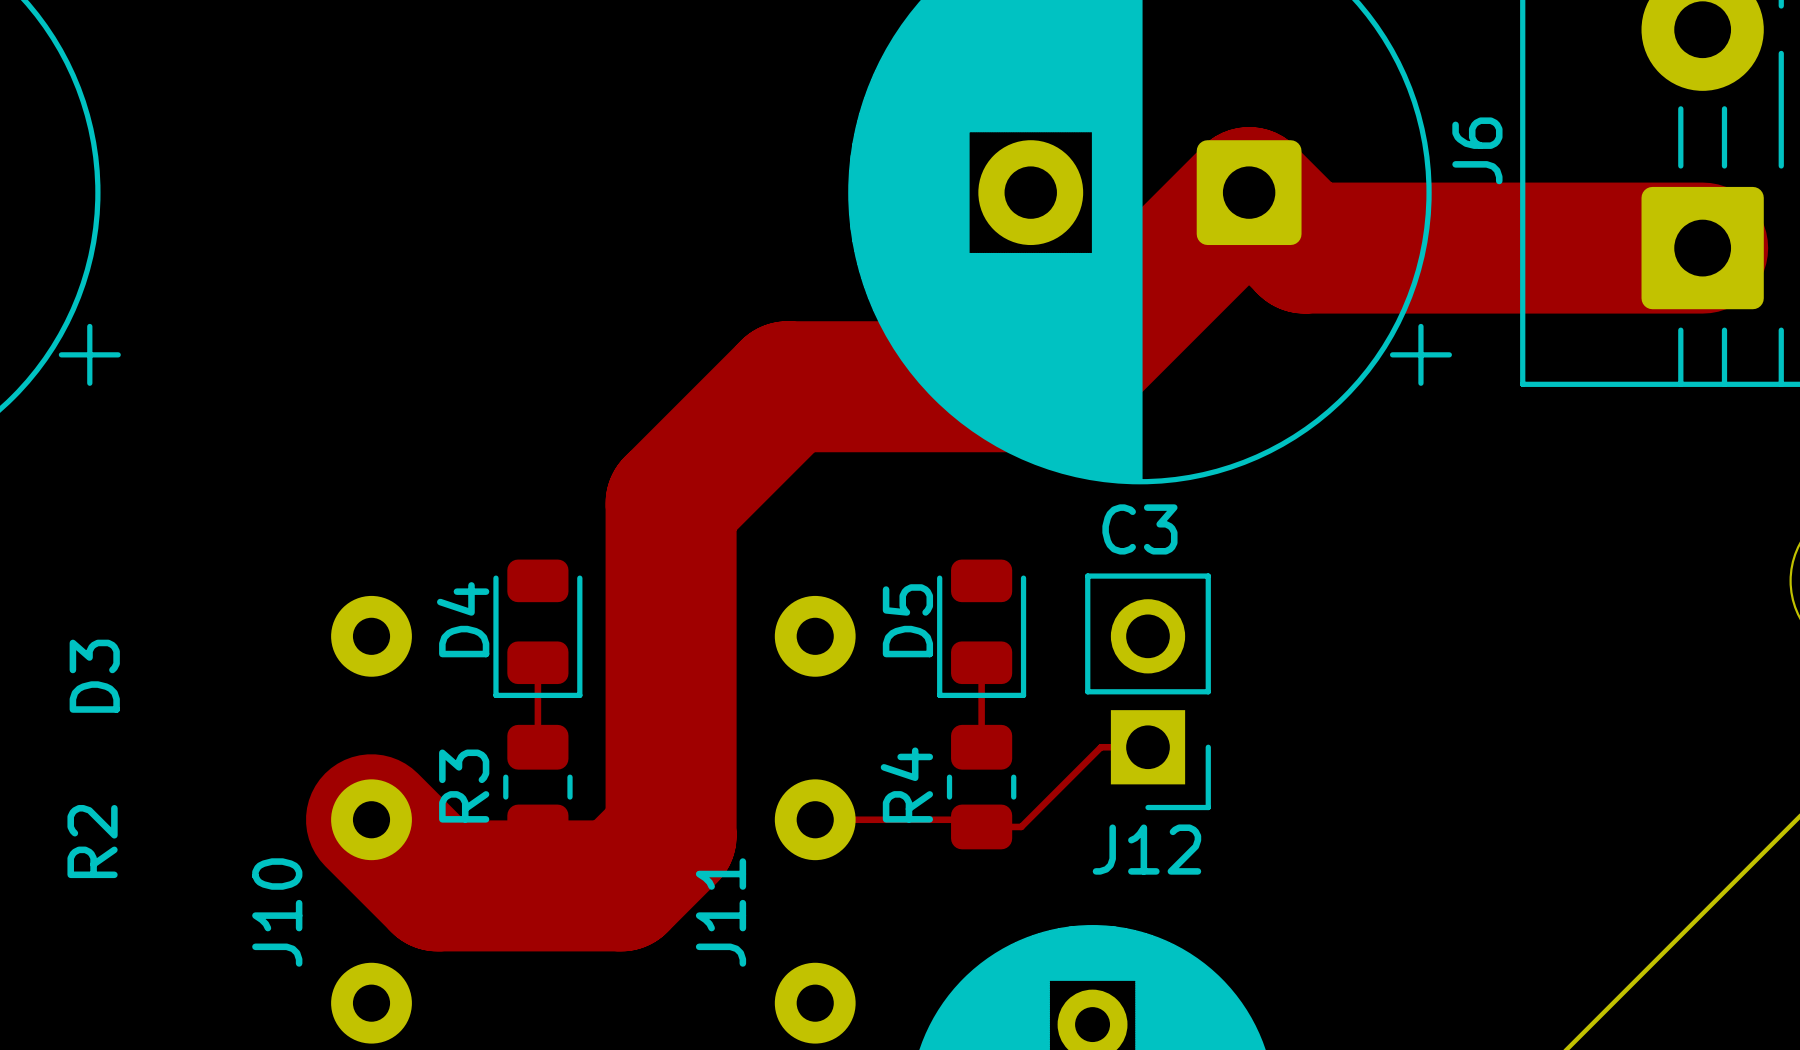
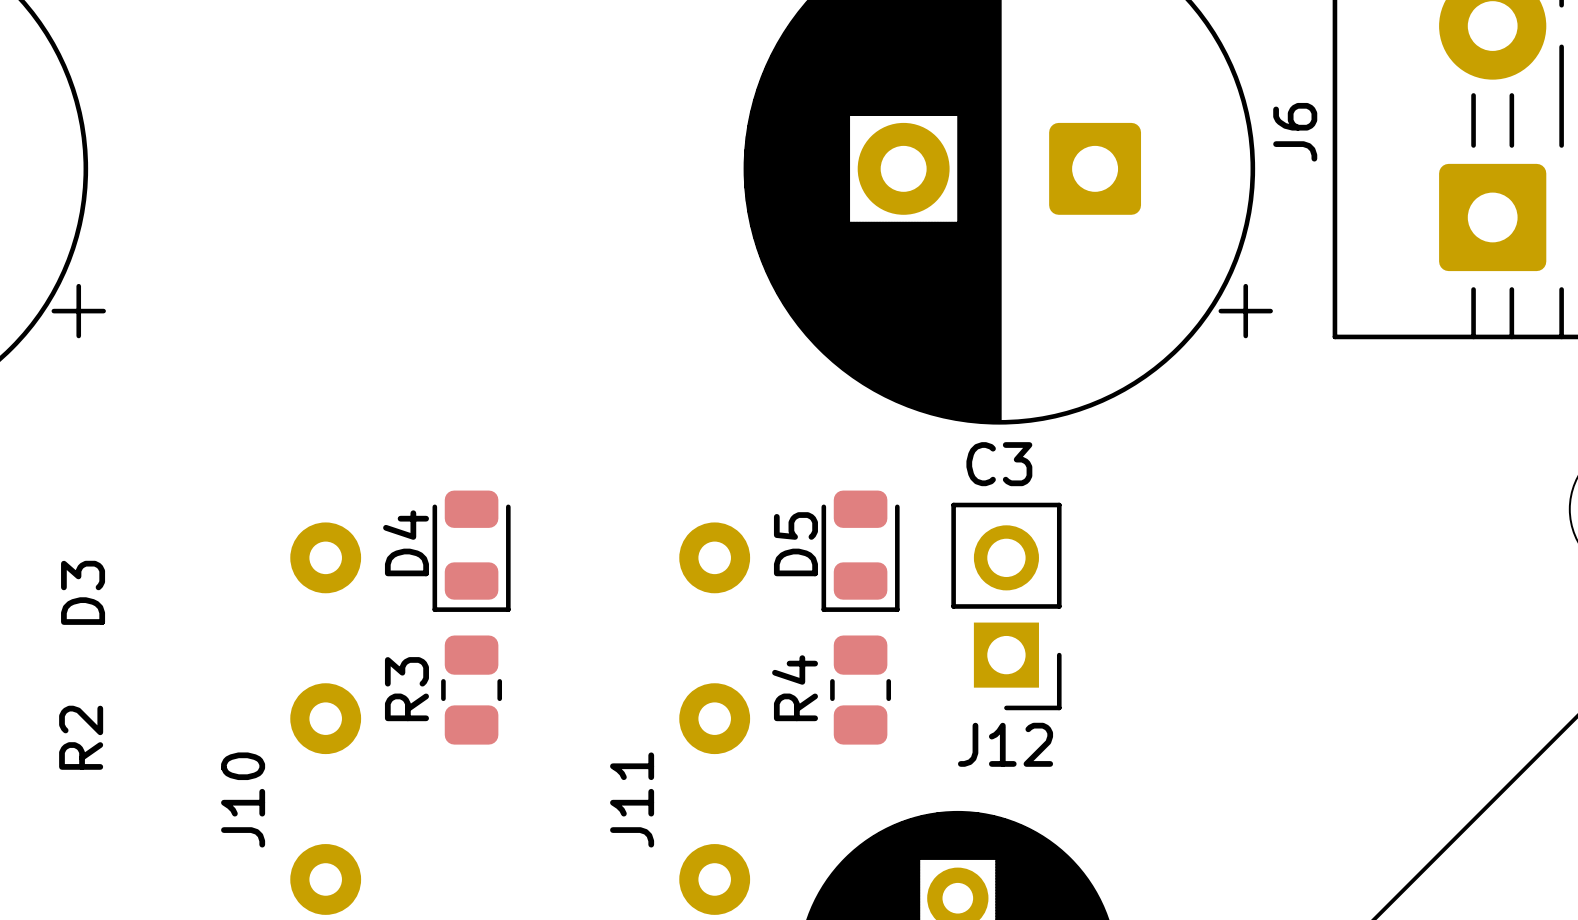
track: (1702, 248) (1304, 248) (1249, 192) (1054, 386) (787, 386) (671, 503) (671, 835) (621, 885) (437, 885) (371, 819) -> none
track: (537, 662) (537, 747) -> none
track: (981, 662) (981, 747) -> none
track: (1148, 747) (1100, 747) (1021, 826) (981, 826) (974, 819) (815, 819) -> none

